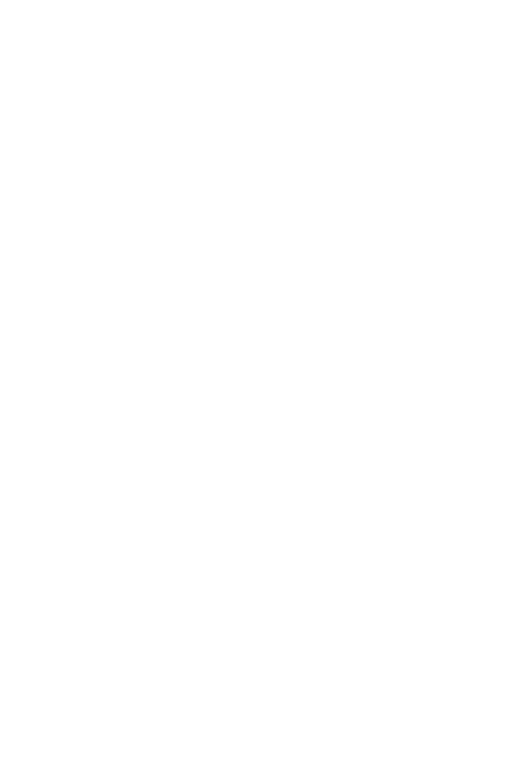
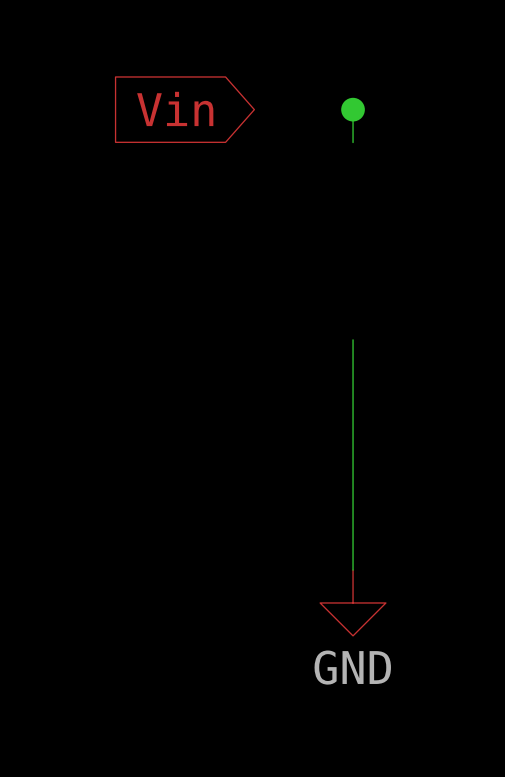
global label: none -> Vin (175, 108)
wire: none -> (353, 109) (353, 142)
junction: none -> (353, 109)
wire: none -> (353, 339) (353, 570)
power symbol: none -> GND (353, 602)

